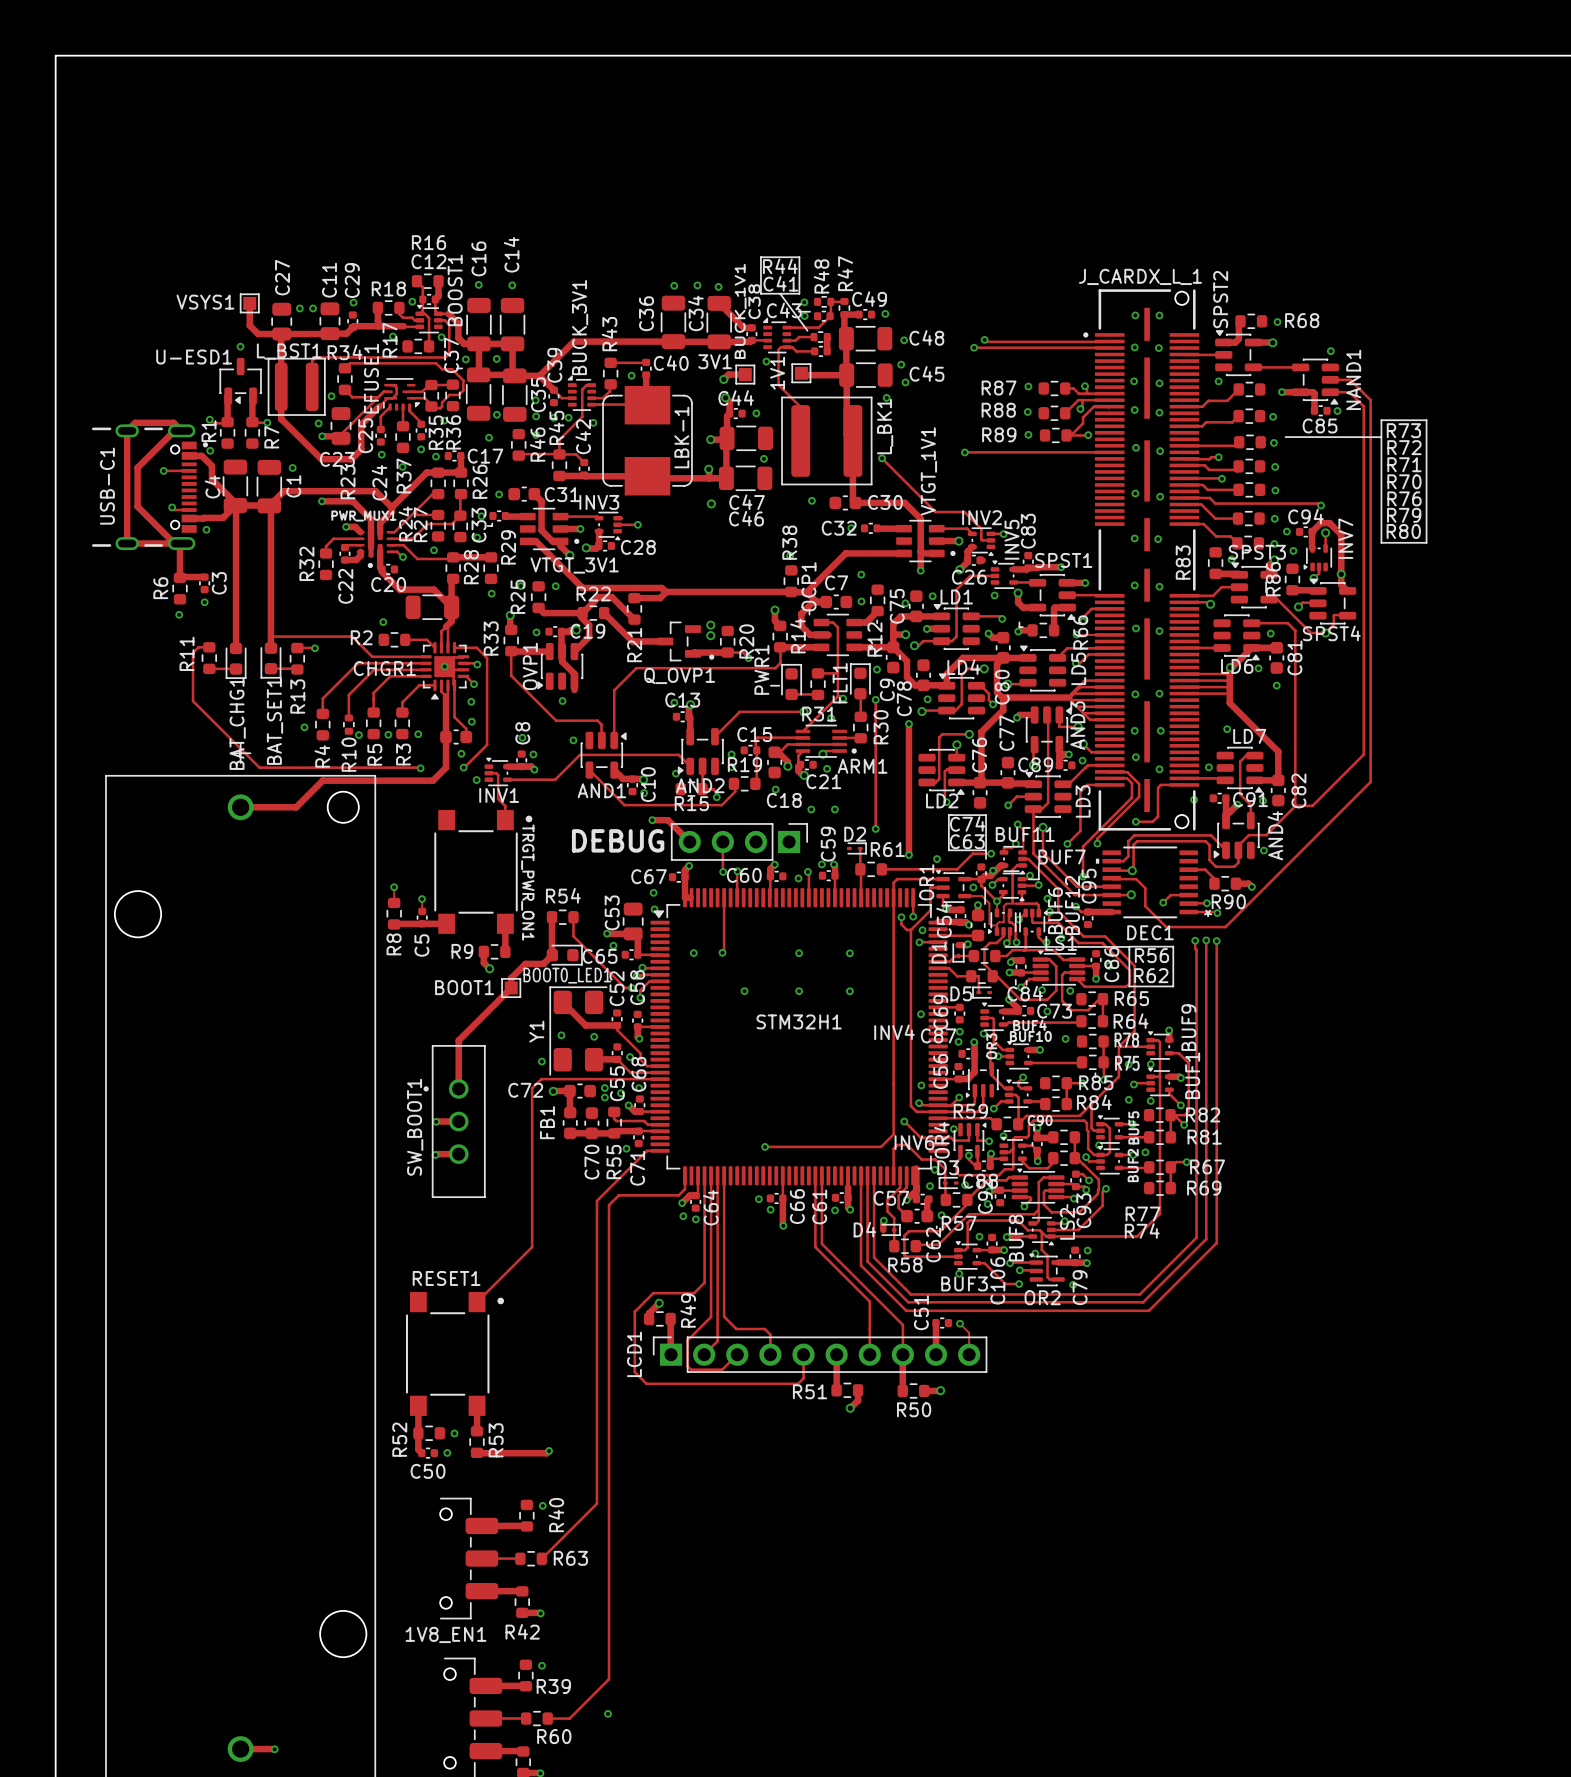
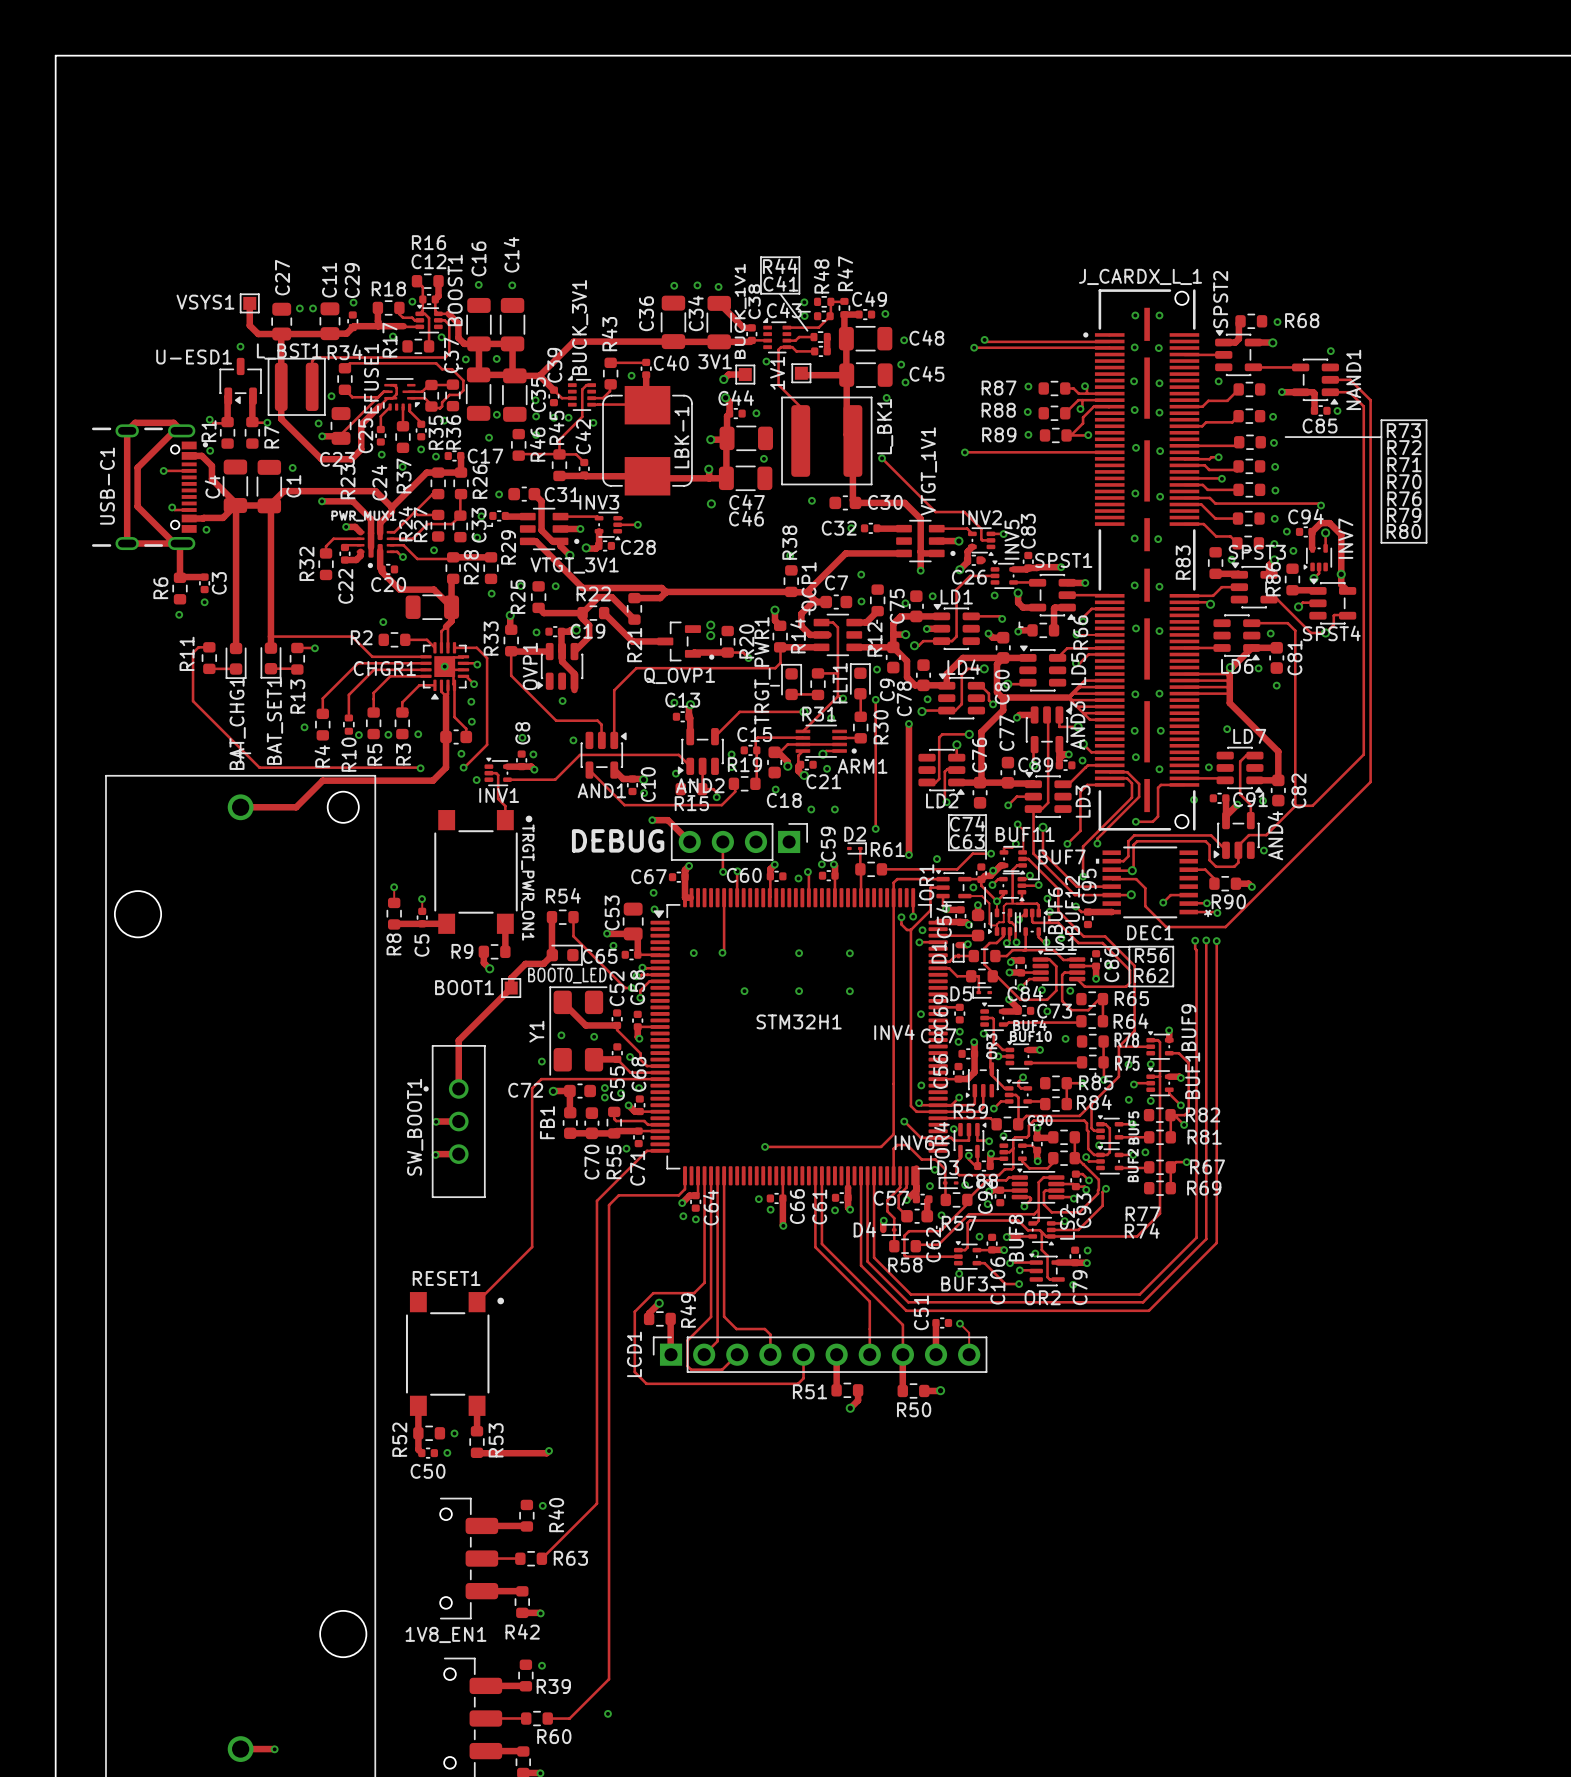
PWR1 name: PWR1 (761, 669) -> TRGT_PWR1 (762, 670)
BOOT0_LED1 name: BOOT0_LED1 (567, 975) -> BOOT0_LED (567, 975)

